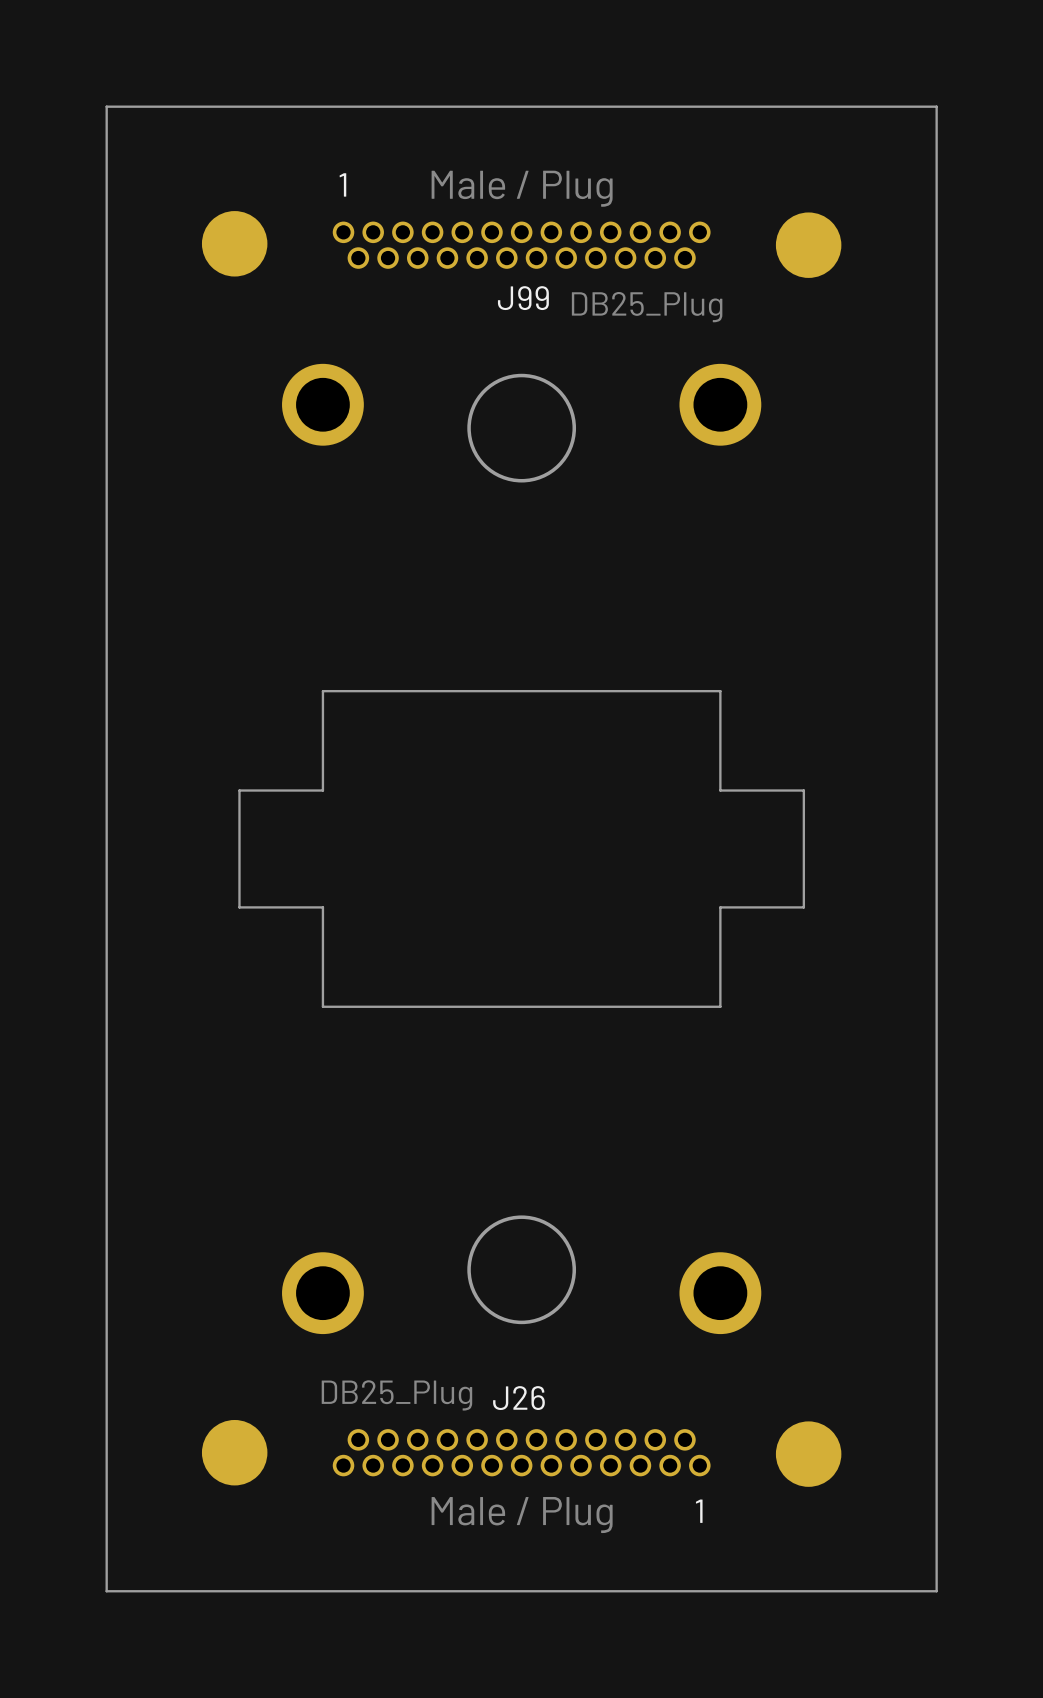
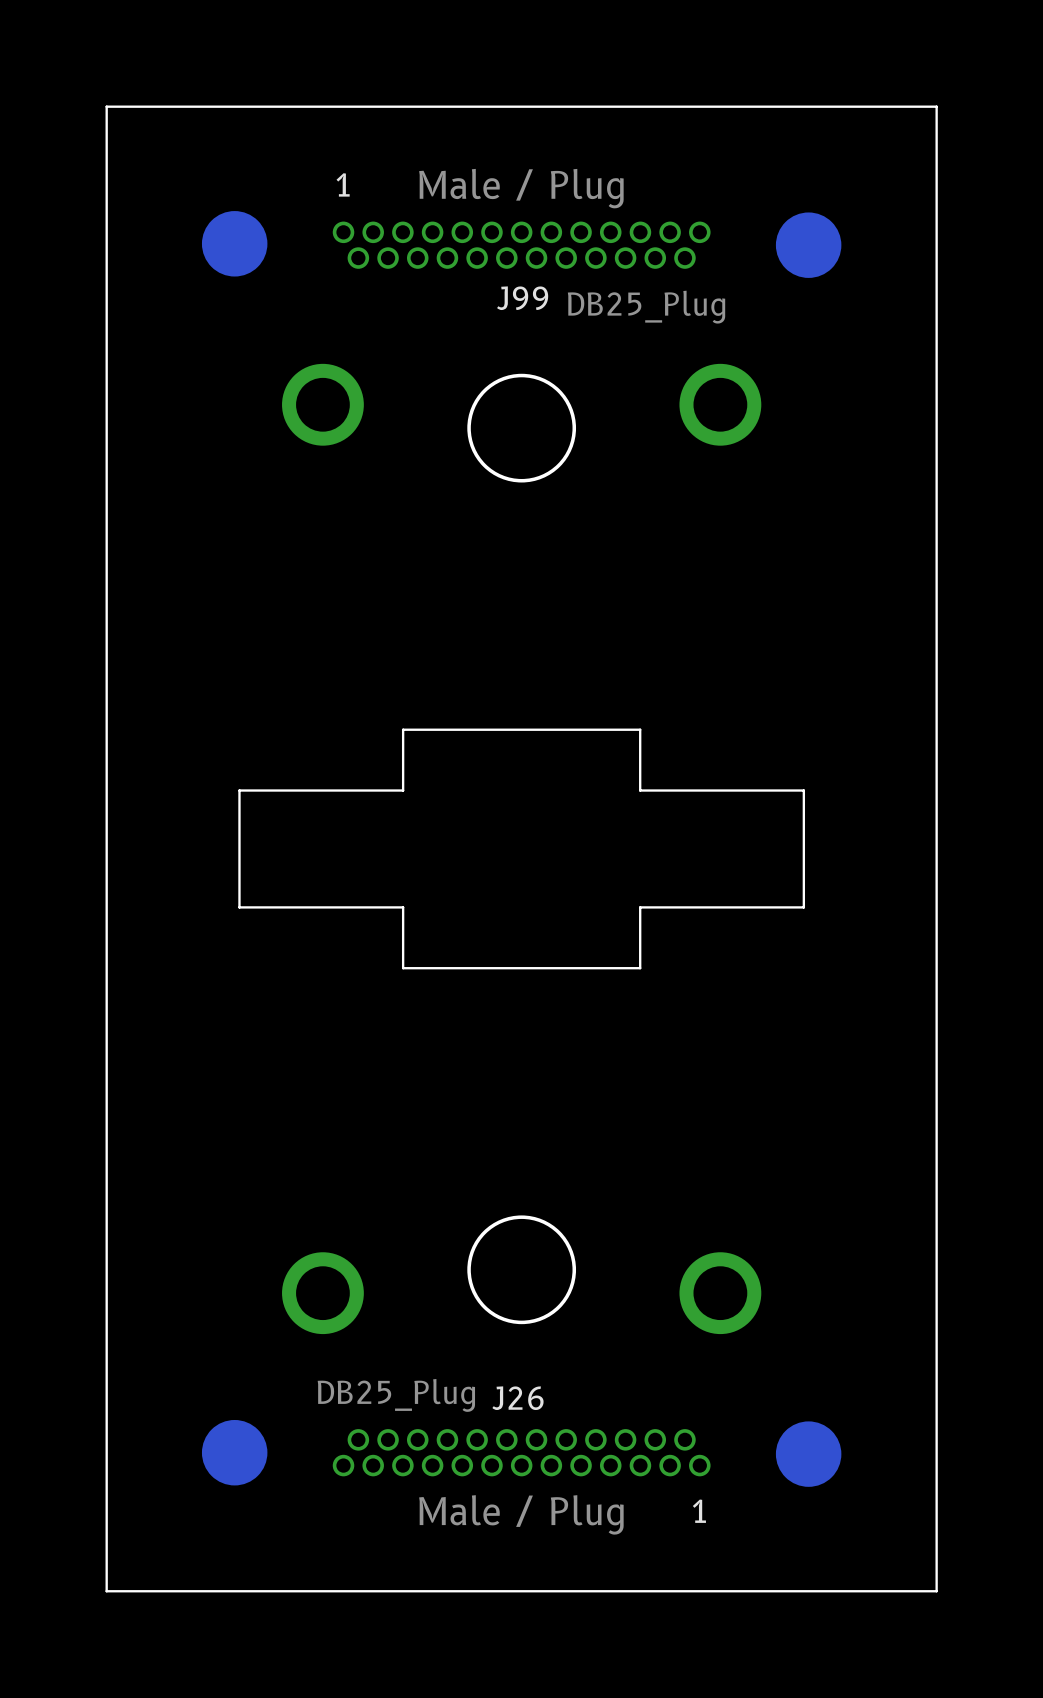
board edge: (720, 790) (720, 691) (322, 691) (322, 790) -> (720, 790) (640, 790) (640, 729) (403, 729) (403, 790) (322, 790)
board edge: (720, 907) (720, 1006) (322, 1006) (322, 907) -> (720, 907) (640, 907) (640, 968) (403, 968) (403, 907) (322, 907)

